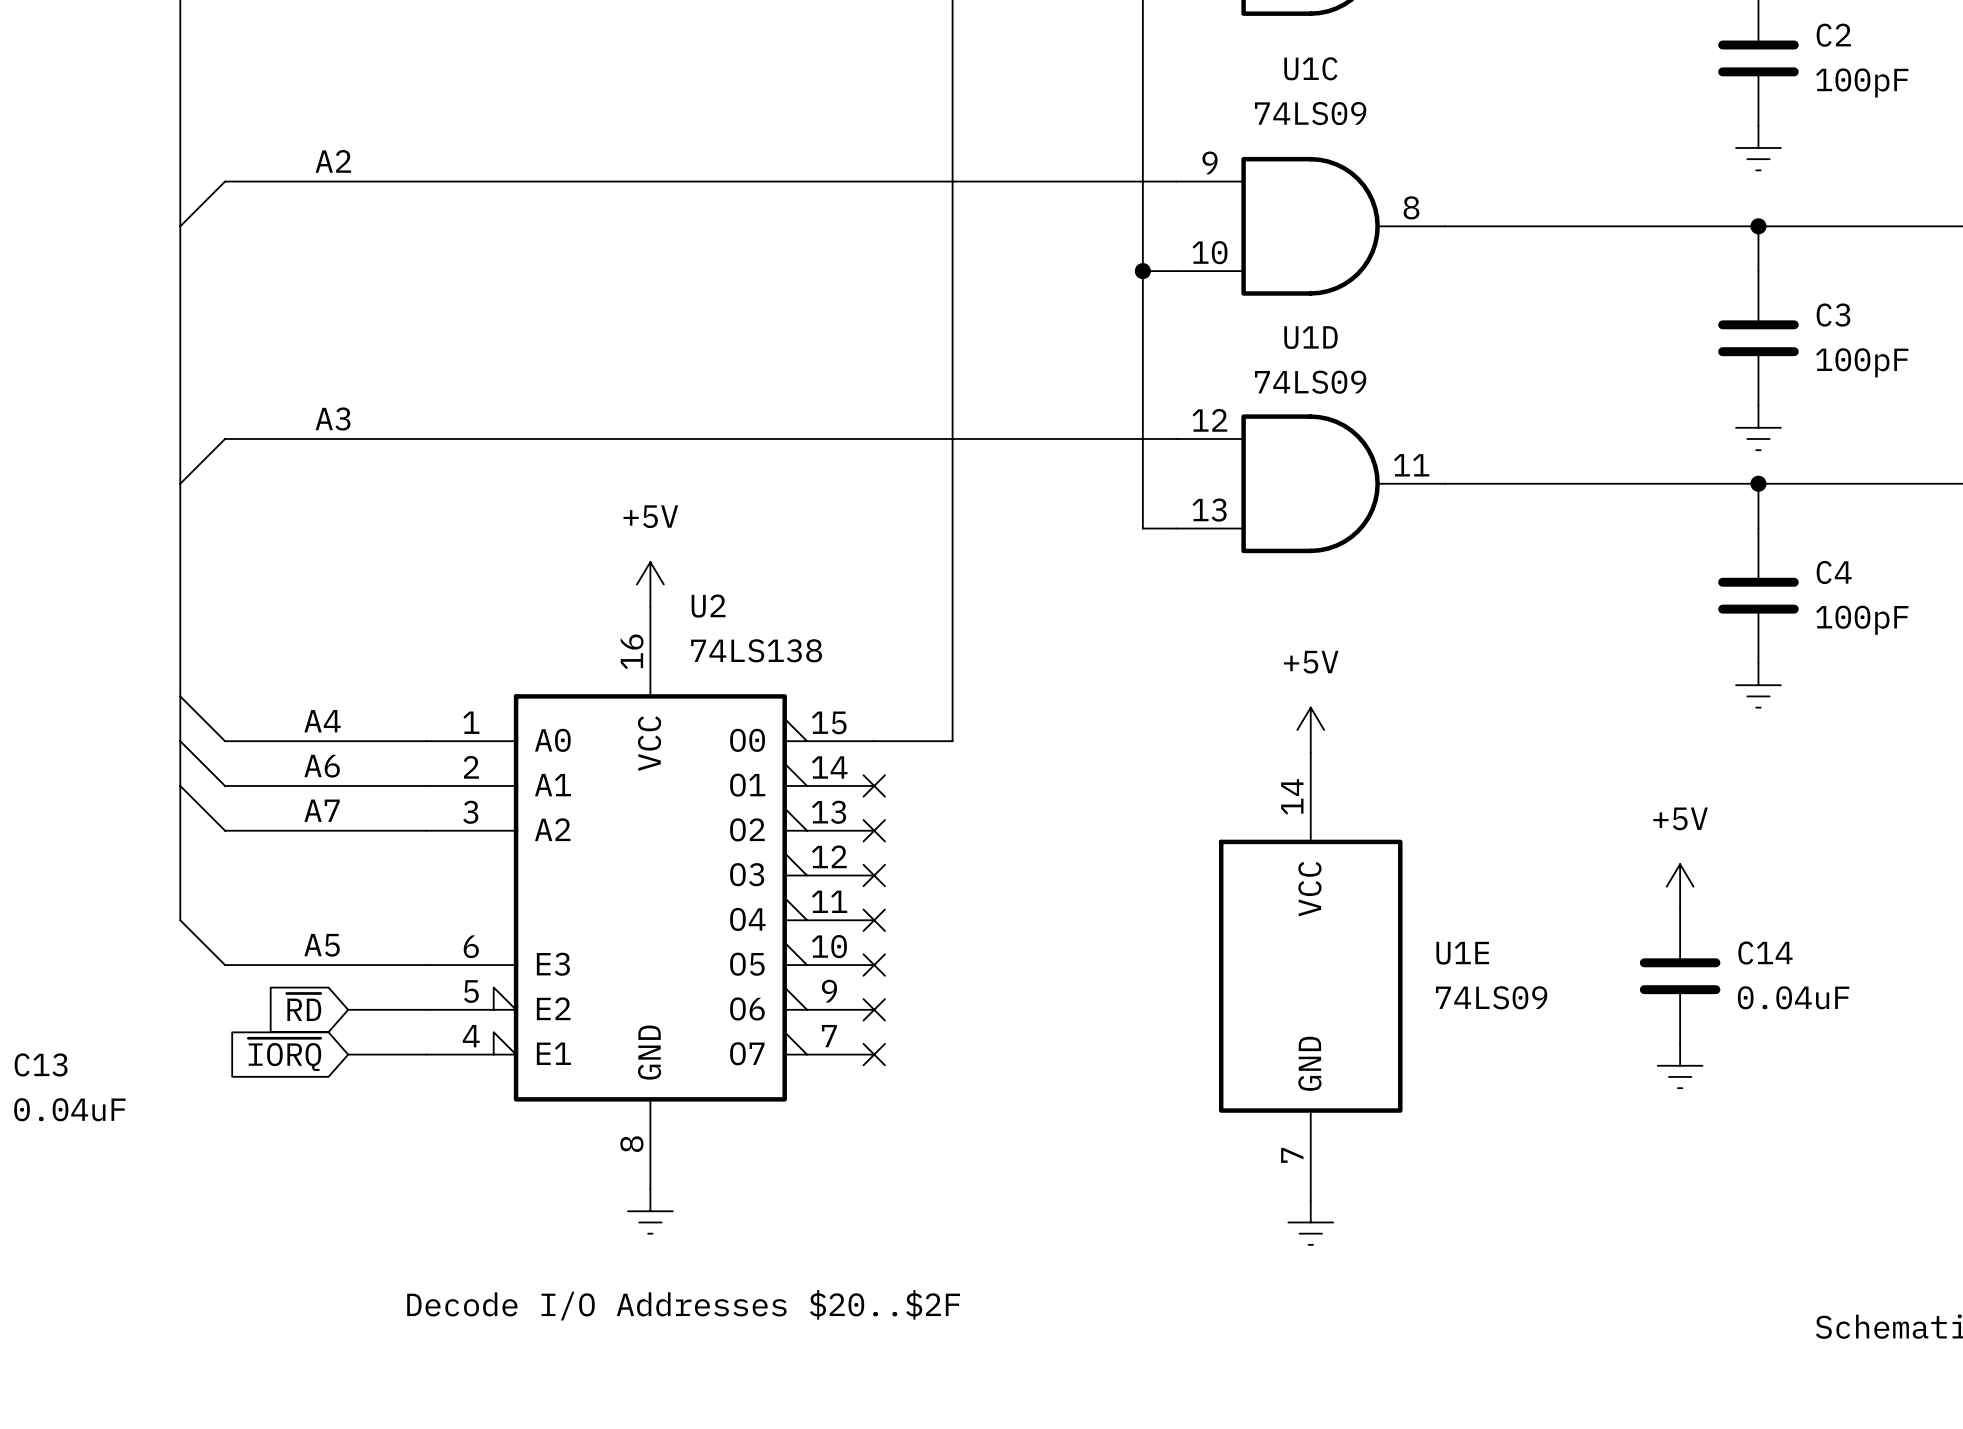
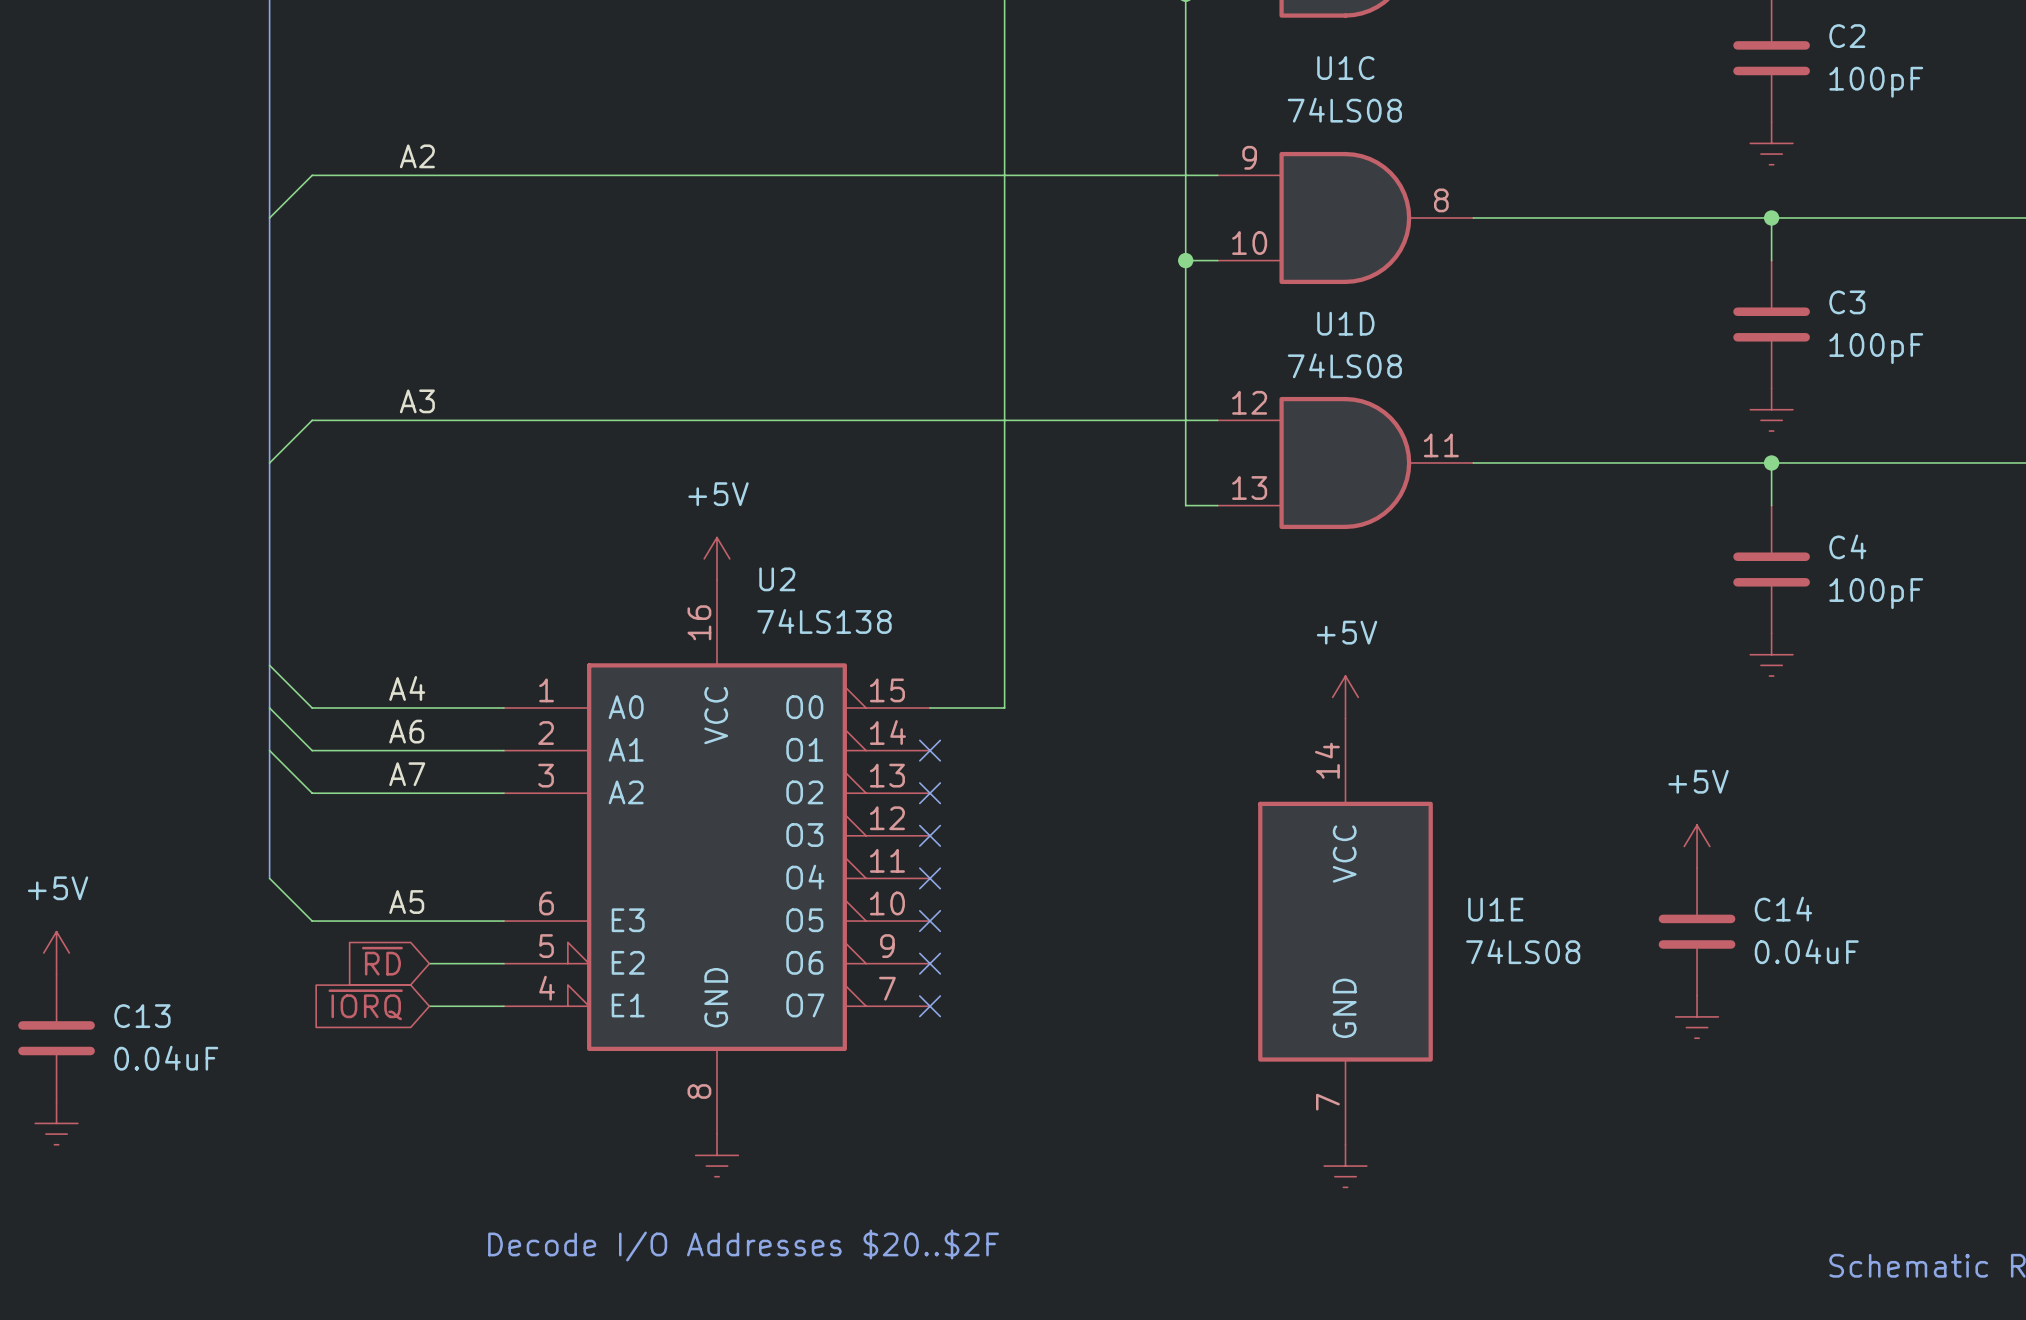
U1C value: 74LS09 (1310, 113) -> 74LS08 (1344, 110)
U1D value: 74LS09 (1310, 382) -> 74LS08 (1344, 365)
U1E value: 74LS09 (1491, 997) -> 74LS08 (1523, 951)

